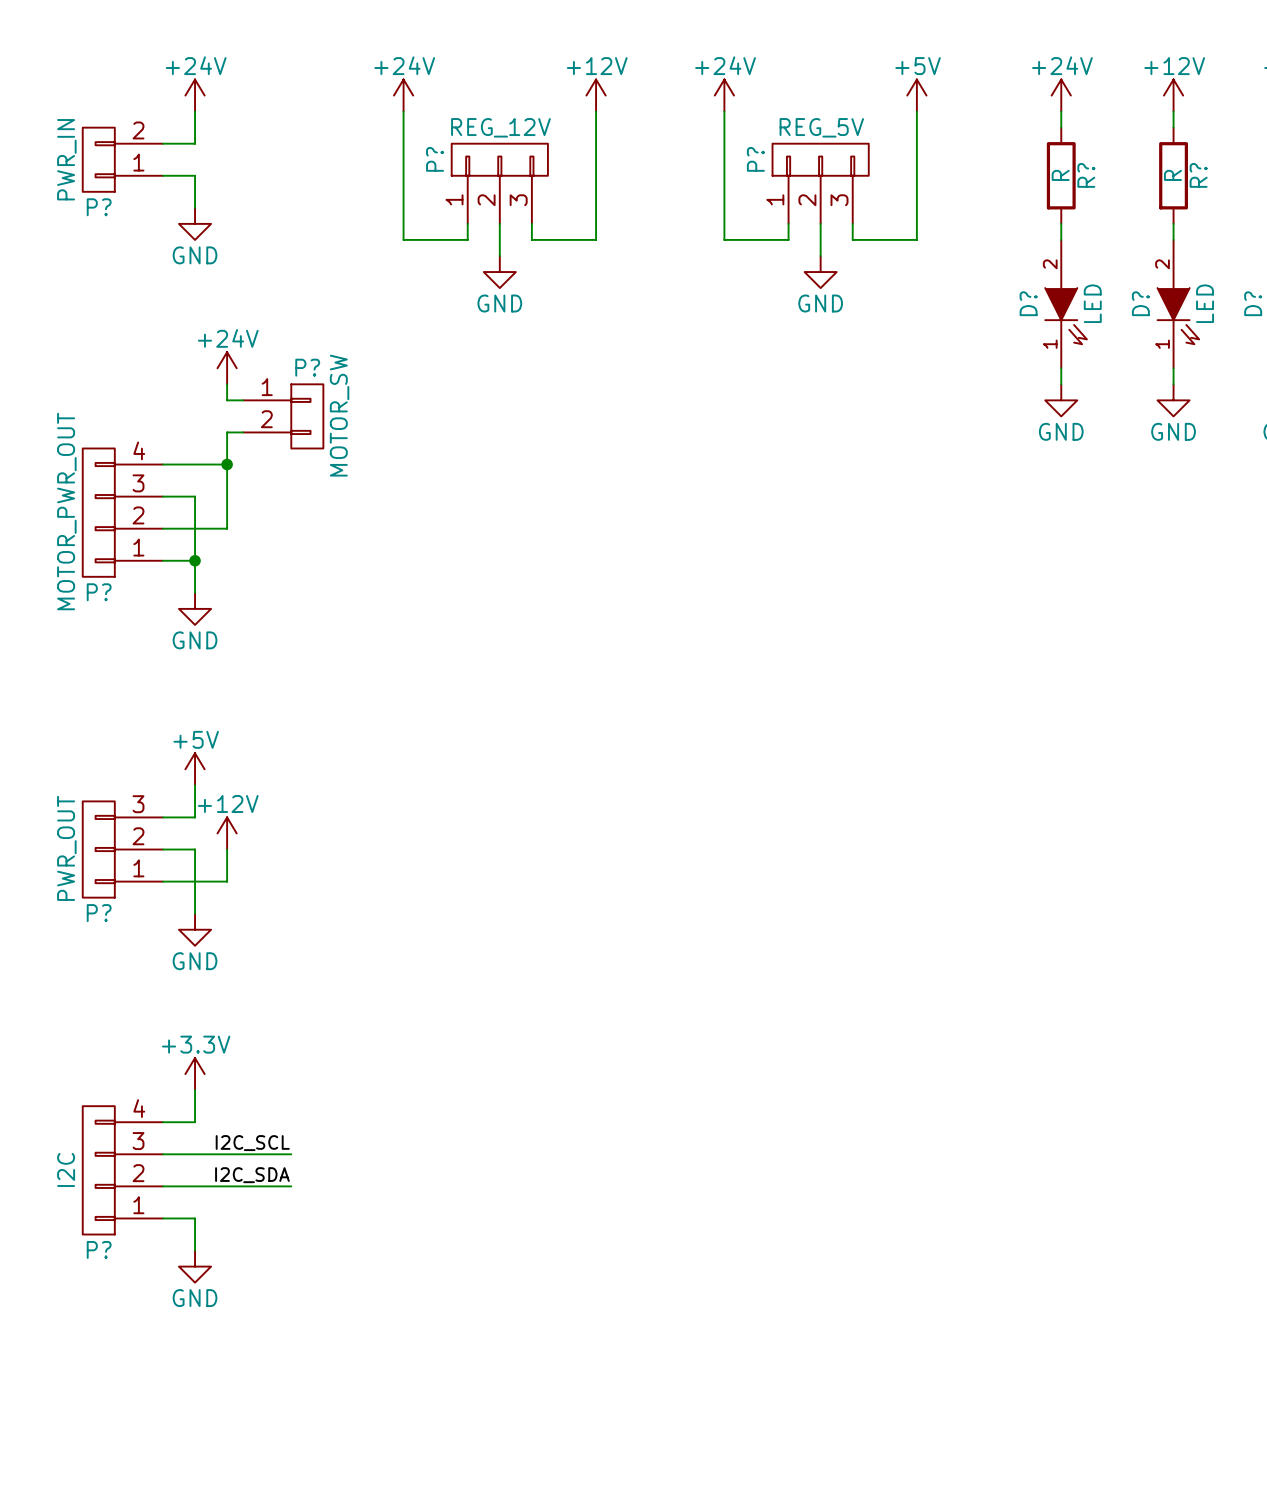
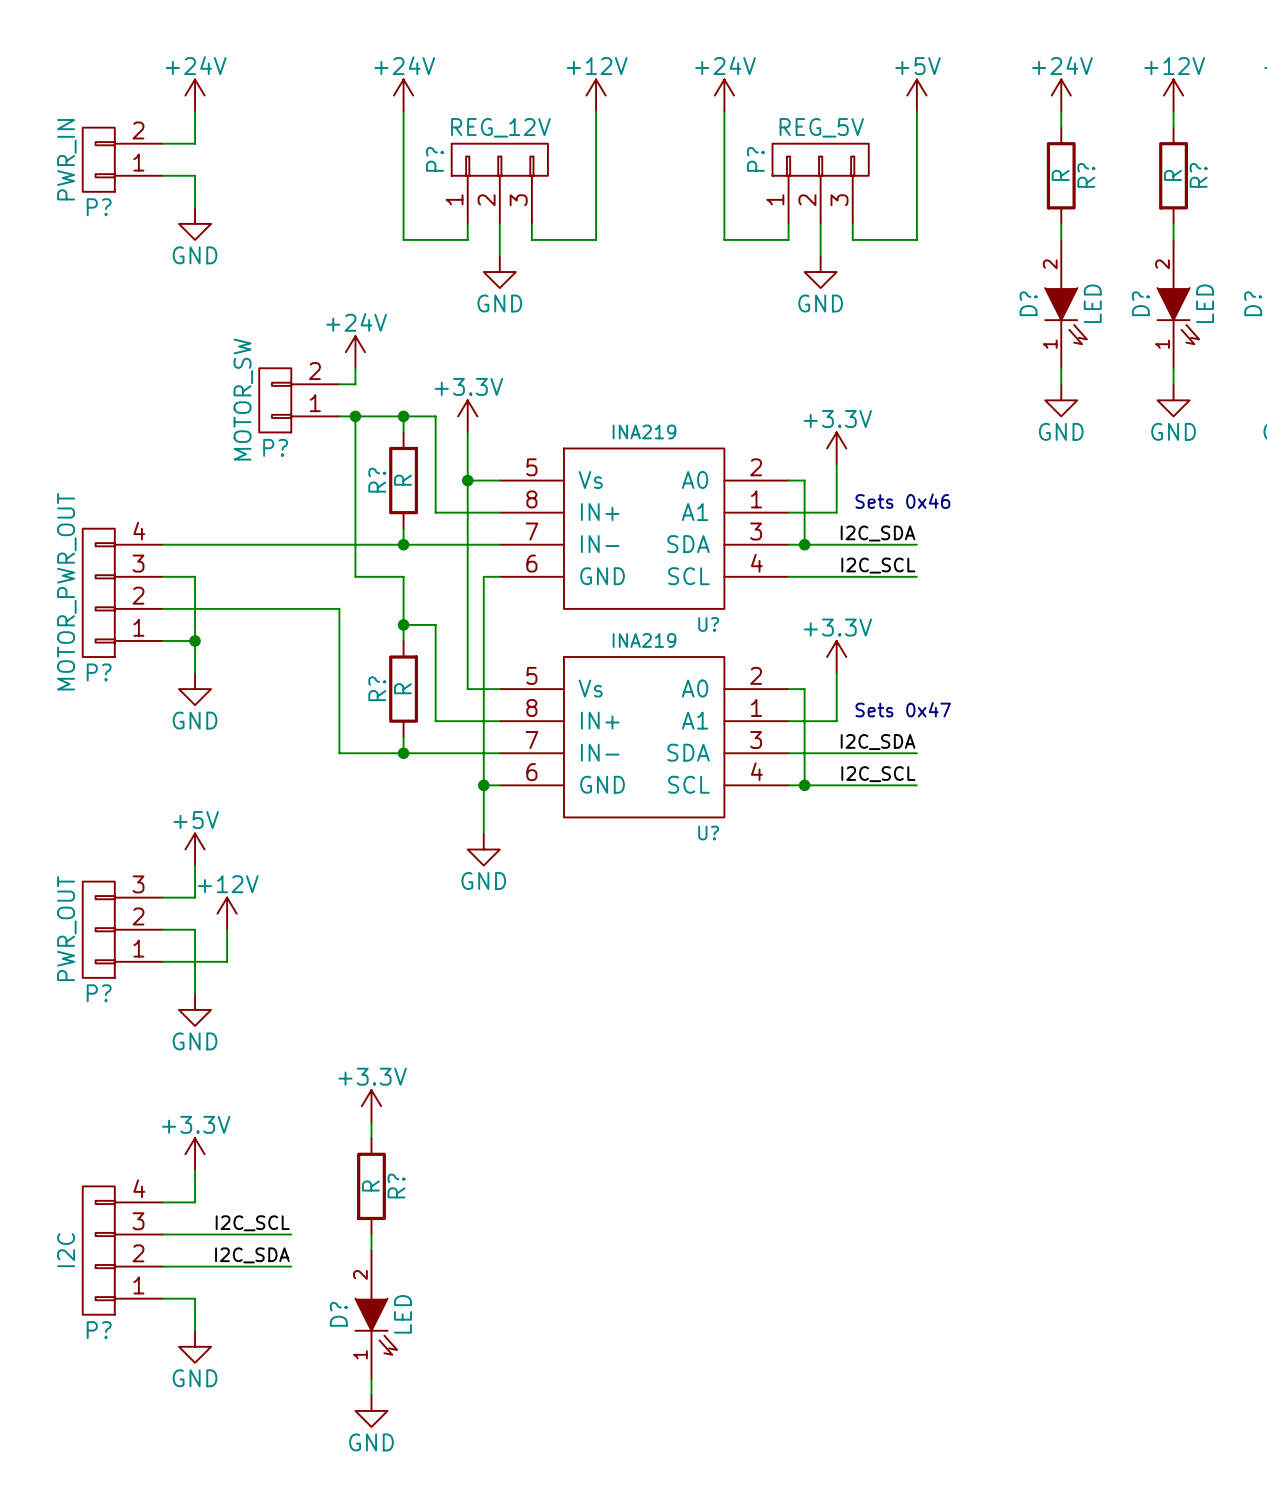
power symbol position: +24V (227, 368) -> +24V (355, 352)
wire: none -> (355, 368) (355, 384) (339, 384)
wire: (227, 384) (227, 400) (243, 400) -> none
P? rotation: 0° (307, 416) -> 180° (275, 400)
wire: none -> (339, 416) (435, 416) (435, 512) (499, 512)
wire: none -> (355, 416) (355, 576) (403, 576) (403, 640)
junction: none -> (355, 416)
wire: none -> (403, 416) (403, 432)
junction: none -> (403, 416)
power symbol: none -> +3.3V (467, 416)
wire: (243, 432) (227, 432) (227, 528) (162, 528) -> none
wire: none -> (467, 432) (467, 689) (499, 689)
power symbol: none -> +3.3V (836, 448)
wire: (162, 464) (227, 464) -> none
junction: (227, 464) -> none
wire: none -> (836, 464) (836, 512) (788, 512)
R?: none -> R (403, 480)
wire: none -> (467, 480) (499, 480)
junction: none -> (467, 480)
wire: none -> (788, 480) (804, 480) (804, 544)
wire: (162, 496) (195, 496) (195, 576) -> (162, 576) (195, 576)
text: none -> Sets 0x46 (902, 501)
P? position: (122, 512) -> (122, 592)
wire: none -> (403, 528) (403, 544)
U?: none -> INA219 (644, 528)
label: none -> I2C_SDA (878, 533)
wire: none -> (162, 544) (499, 544)
junction: none -> (403, 544)
wire: none -> (788, 544) (916, 544)
junction: none -> (804, 544)
wire: (162, 560) (195, 560) -> (162, 640) (195, 640)
junction: (195, 560) -> none
label: none -> I2C_SCL (878, 565)
wire: none -> (499, 576) (483, 576) (483, 833)
wire: none -> (788, 576) (916, 576)
wire: none -> (195, 592) (195, 673)
wire: none -> (162, 608) (339, 608) (339, 753) (499, 753)
power symbol position: GND (195, 608) -> GND (195, 689)
wire: none -> (403, 624) (435, 624) (435, 721) (499, 721)
junction: none -> (403, 624)
junction: none -> (195, 640)
power symbol: none -> +3.3V (836, 657)
wire: none -> (836, 673) (836, 721) (788, 721)
R?: none -> R (403, 689)
wire: none -> (788, 689) (804, 689) (804, 785)
text: none -> Sets 0x47 (903, 709)
wire: none -> (403, 737) (403, 753)
U?: none -> INA219 (644, 737)
label: none -> I2C_SDA (878, 742)
junction: none -> (403, 753)
wire: none -> (788, 753) (916, 753)
power symbol position: +5V (195, 769) -> +5V (195, 849)
label: none -> I2C_SCL (878, 774)
wire: (195, 785) (195, 817) (162, 817) -> none
wire: none -> (483, 785) (499, 785)
junction: none -> (483, 785)
wire: none -> (788, 785) (916, 785)
junction: none -> (804, 785)
power symbol position: +12V (227, 833) -> +12V (227, 913)
P? position: (122, 849) -> (122, 929)
wire: (162, 849) (195, 849) (195, 865) -> none
wire: (227, 849) (227, 881) (162, 881) -> (227, 929) (227, 961) (162, 961)
power symbol: none -> GND (483, 849)
wire: (195, 897) (195, 913) -> (195, 897) (162, 897)
wire: none -> (162, 929) (195, 929) (195, 993)
power symbol position: GND (195, 929) -> GND (195, 1009)
power symbol position: +3.3V (195, 1074) -> +3.3V (195, 1154)
wire: (195, 1090) (195, 1122) (162, 1122) -> (195, 1170) (195, 1202) (162, 1202)
power symbol: none -> +3.3V (371, 1106)
wire: none -> (371, 1122) (371, 1138)
label position: I2C_SCL (252, 1143) -> I2C_SCL (252, 1223)
wire: (162, 1154) (291, 1154) -> (162, 1234) (291, 1234)
P? position: (122, 1170) -> (122, 1250)
label position: I2C_SDA (252, 1175) -> I2C_SDA (252, 1255)
wire: (162, 1186) (291, 1186) -> (162, 1266) (291, 1266)
R?: none -> R (371, 1186)
wire: (162, 1218) (195, 1218) (195, 1250) -> (162, 1298) (195, 1298) (195, 1330)
wire: none -> (371, 1234) (371, 1250)
power symbol position: GND (195, 1266) -> GND (195, 1346)
D?: none -> LED (376, 1314)
wire: none -> (371, 1378) (371, 1394)
power symbol: none -> GND (371, 1410)

